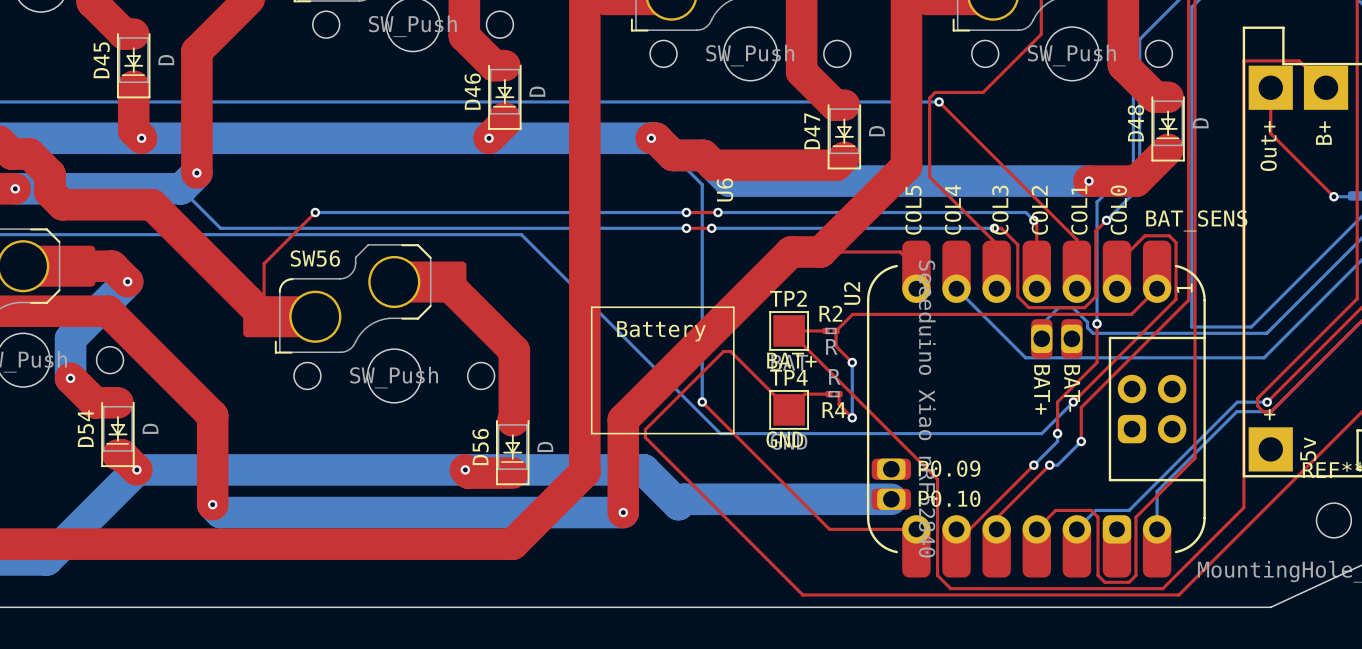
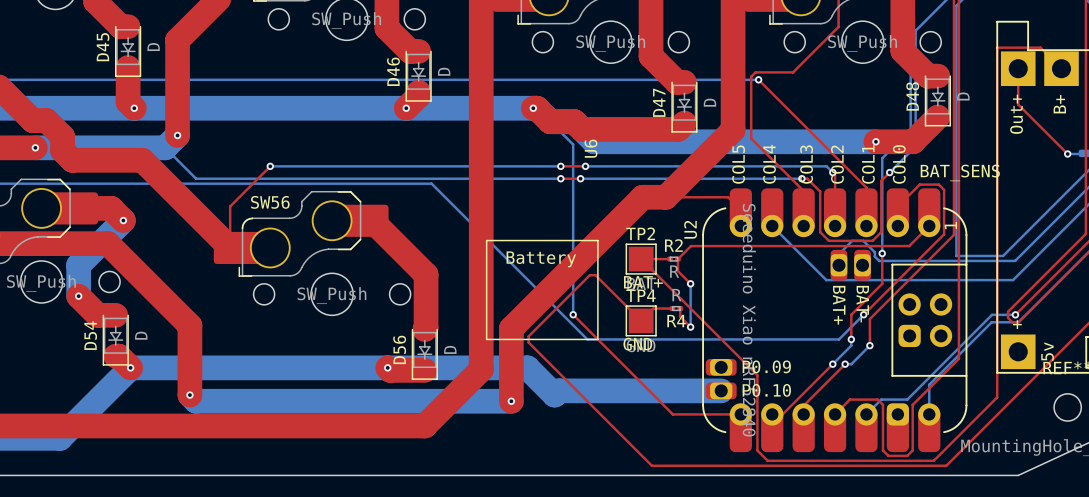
D45 footprint: [116, 26, 151, 99] -> [115, 21, 142, 77]
D46 footprint: [488, 58, 522, 130] -> [405, 45, 432, 102]
D48 footprint: [1151, 90, 1185, 162] -> [924, 70, 951, 127]
D47 footprint: [827, 98, 862, 170] -> [671, 76, 698, 133]
D54 footprint: [101, 395, 135, 468] -> [102, 309, 129, 366]
D56 footprint: [496, 413, 530, 486] -> [411, 323, 438, 380]

